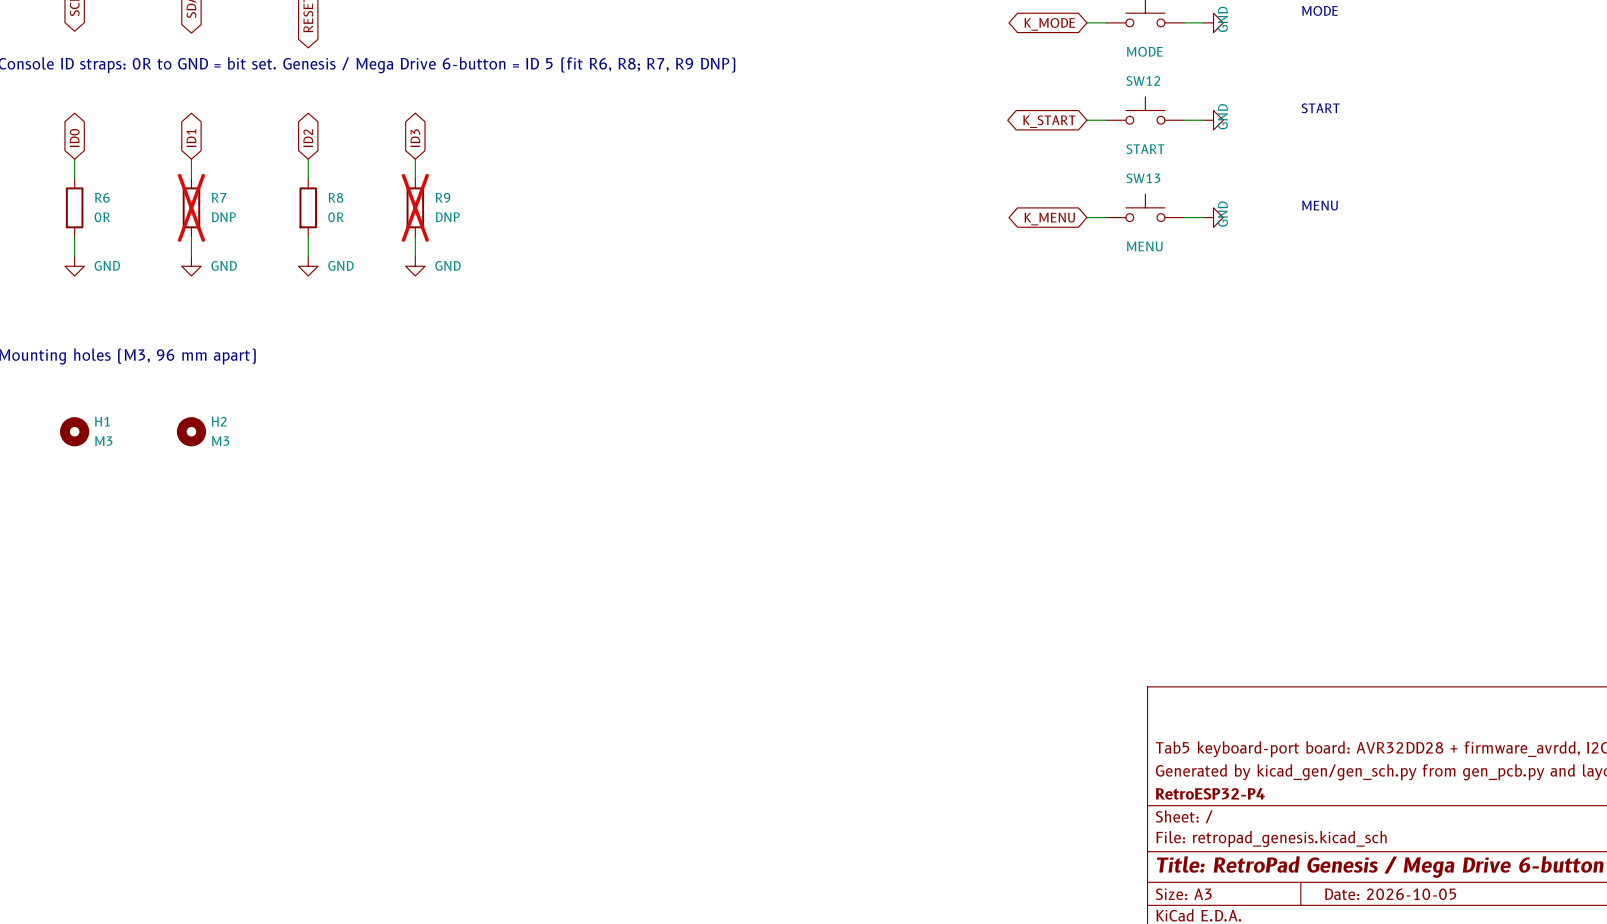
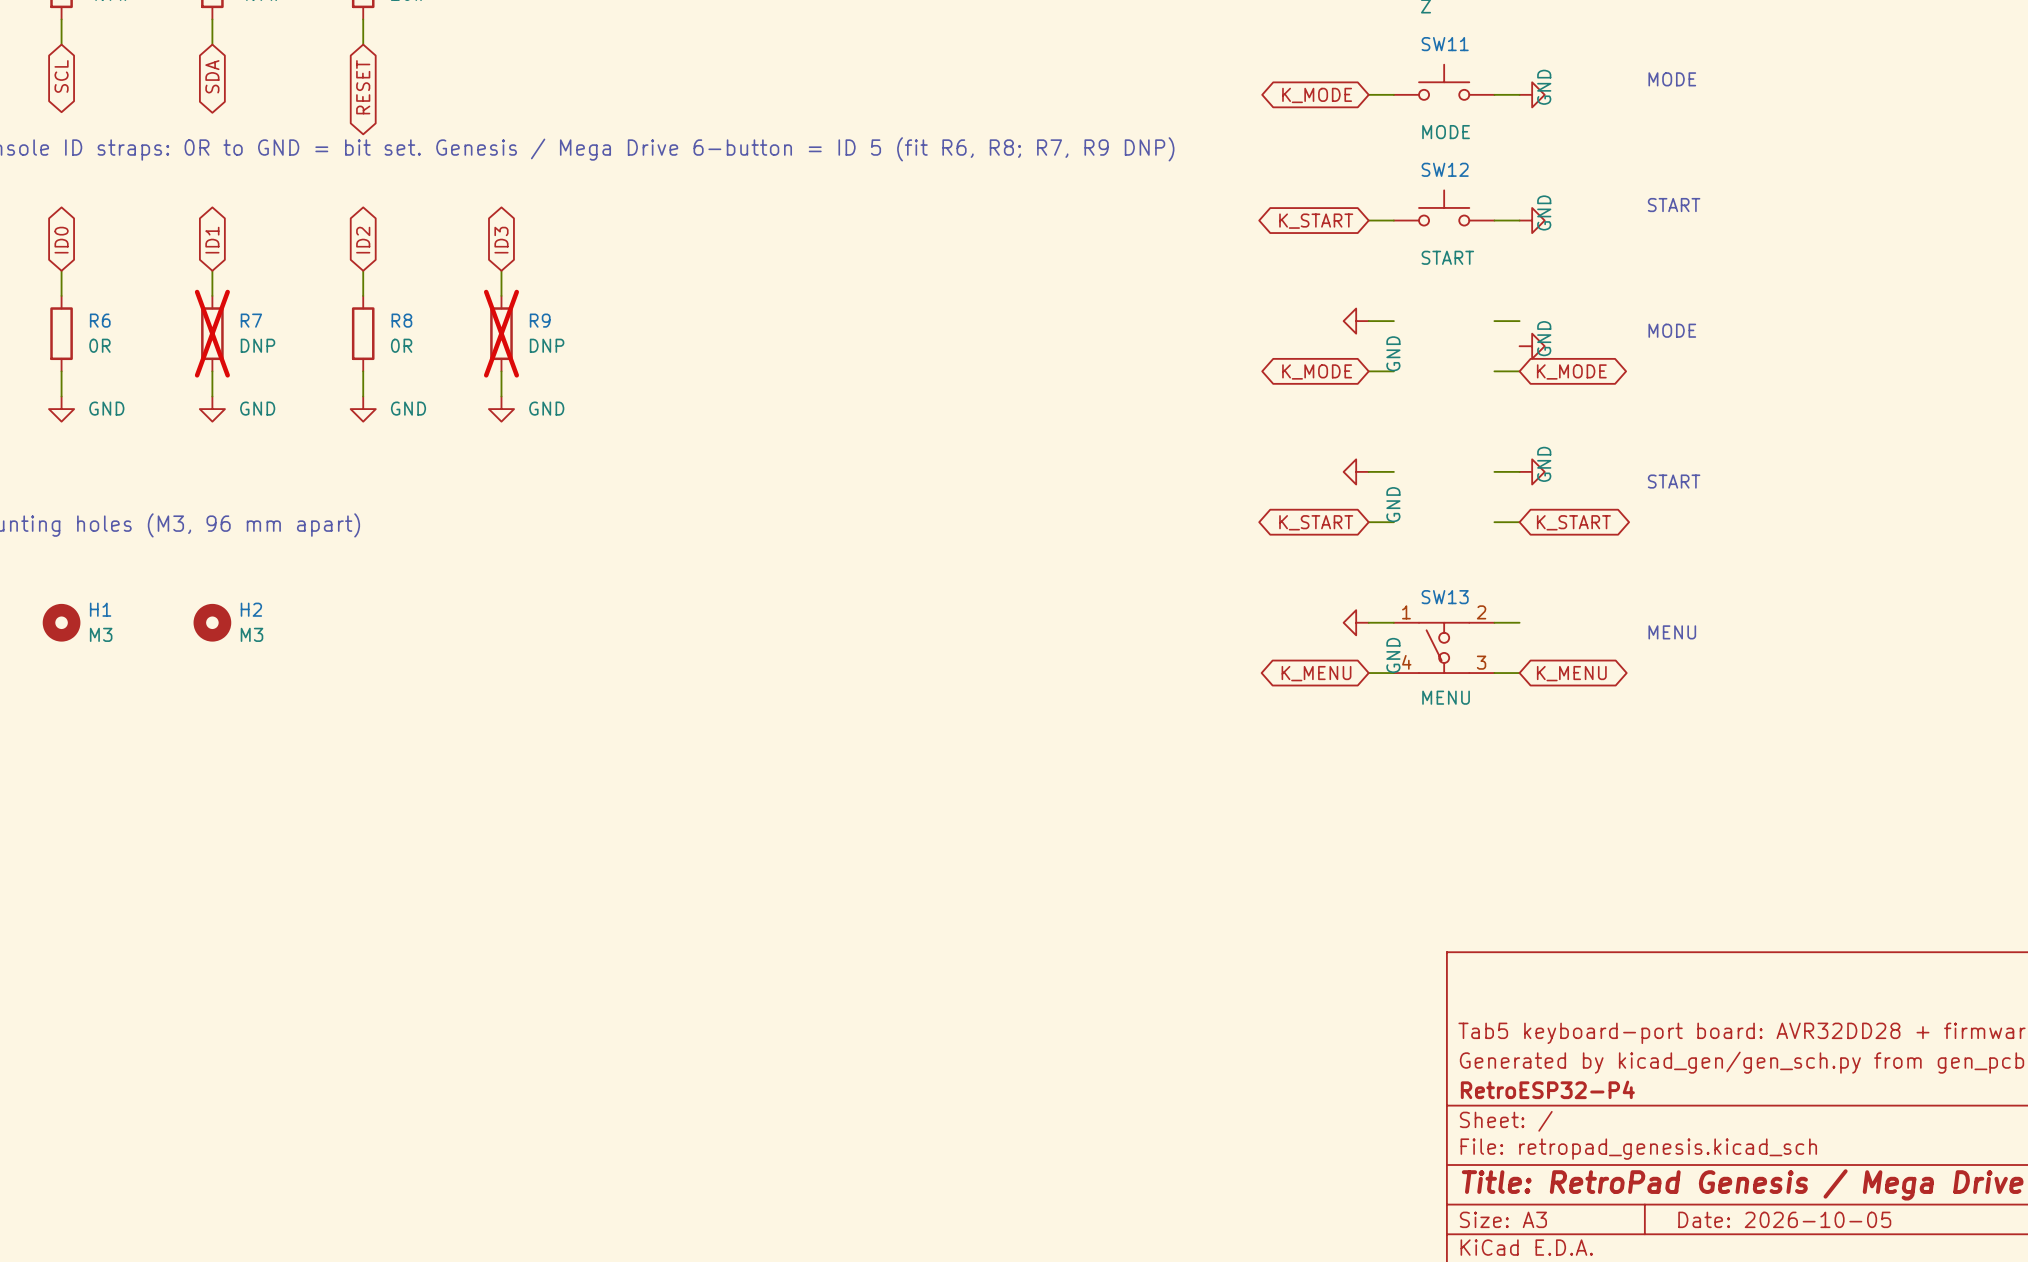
SW13 symbol: [1106, 194, 1185, 222] -> [1393, 622, 1495, 674]
power symbol: none -> GND (1356, 321)
wire: none -> (1368, 321) (1393, 321)
wire: none -> (1494, 321) (1519, 321)
text: MENU (1320, 205) -> MODE (1672, 330)
wire: (1086, 217) (1106, 217) -> (1368, 371) (1393, 371)
wire: (1184, 217) (1203, 217) -> (1494, 371) (1519, 371)
global label: K_MENU (1049, 219) -> K_MODE (1317, 371)
global label: none -> K_MODE (1571, 371)
power symbol: none -> GND (1356, 471)
wire: none -> (1368, 471) (1393, 471)
wire: none -> (1494, 471) (1519, 471)
power symbol: none -> GND (1532, 471)
text: none -> START (1674, 481)
wire: none -> (1368, 522) (1393, 522)
wire: none -> (1494, 522) (1519, 522)
global label: none -> K_START (1316, 522)
global label: none -> K_START (1573, 522)
power symbol: none -> GND (1356, 622)
wire: none -> (1368, 622) (1393, 622)
wire: none -> (1494, 622) (1519, 622)
text: none -> MENU (1672, 632)
wire: none -> (1368, 673) (1393, 673)
wire: none -> (1494, 673) (1519, 673)
global label: none -> K_MENU (1316, 673)
global label: none -> K_MENU (1571, 673)

